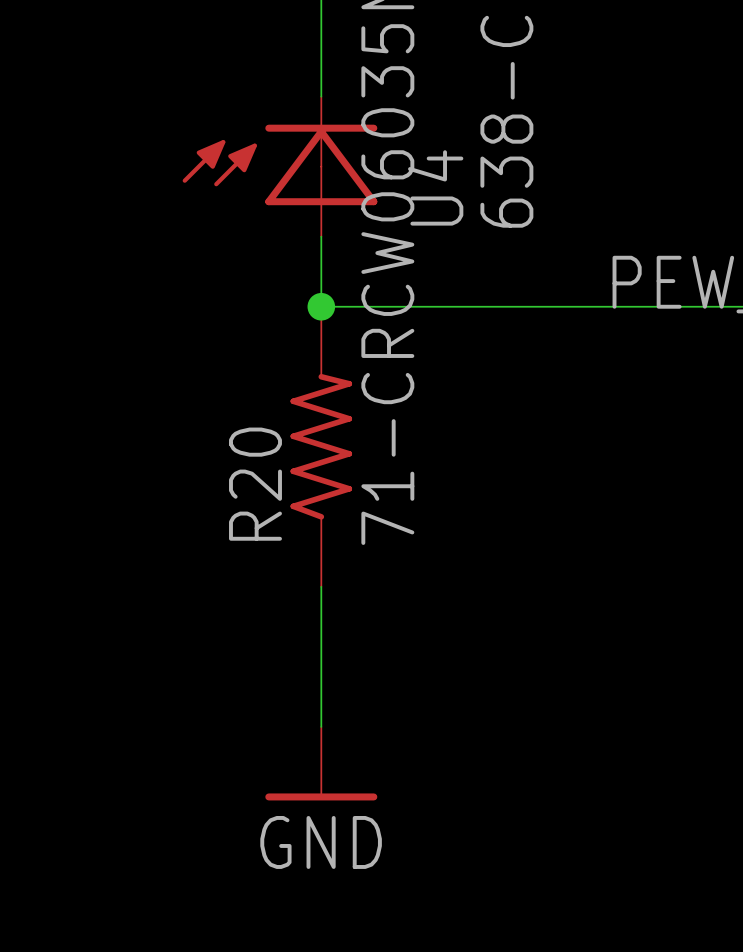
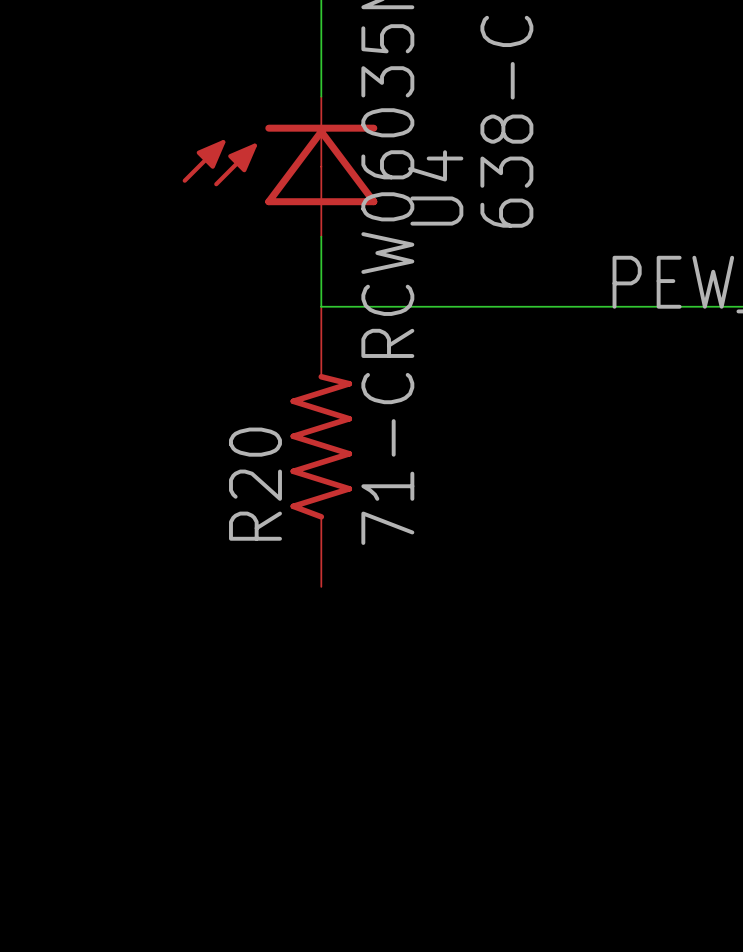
junction: (321, 306) -> none
wire: (321, 586) (321, 726) -> none
power symbol: GND (321, 763) -> none

